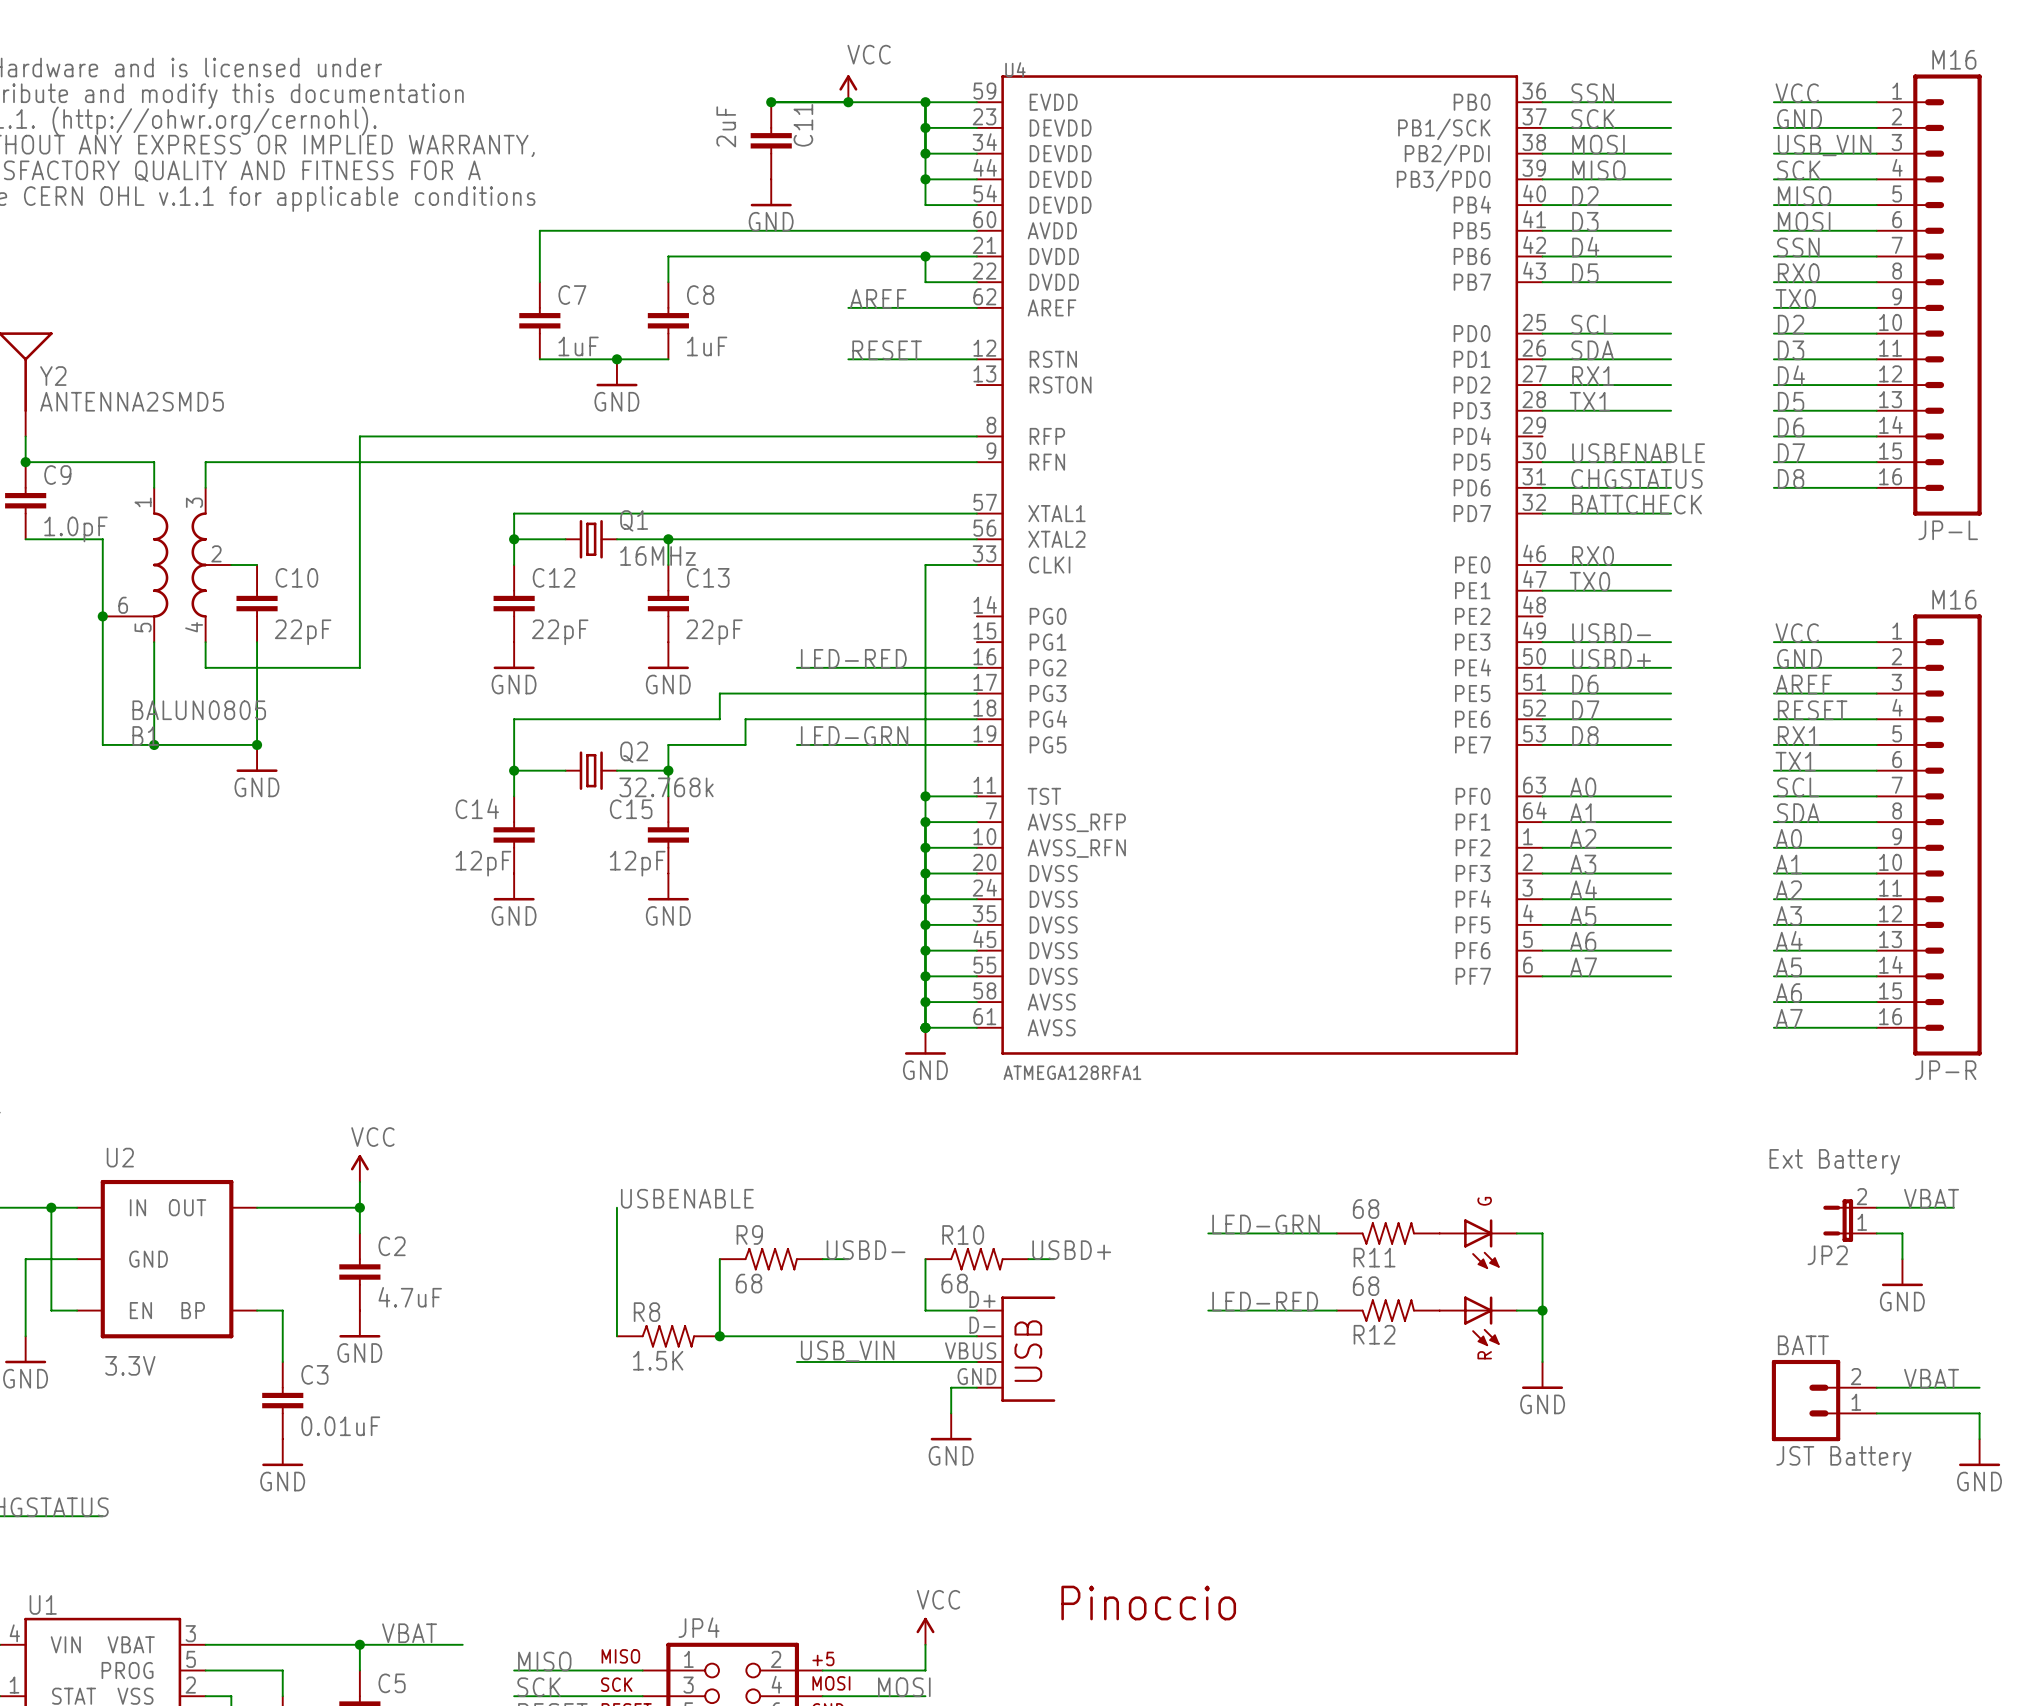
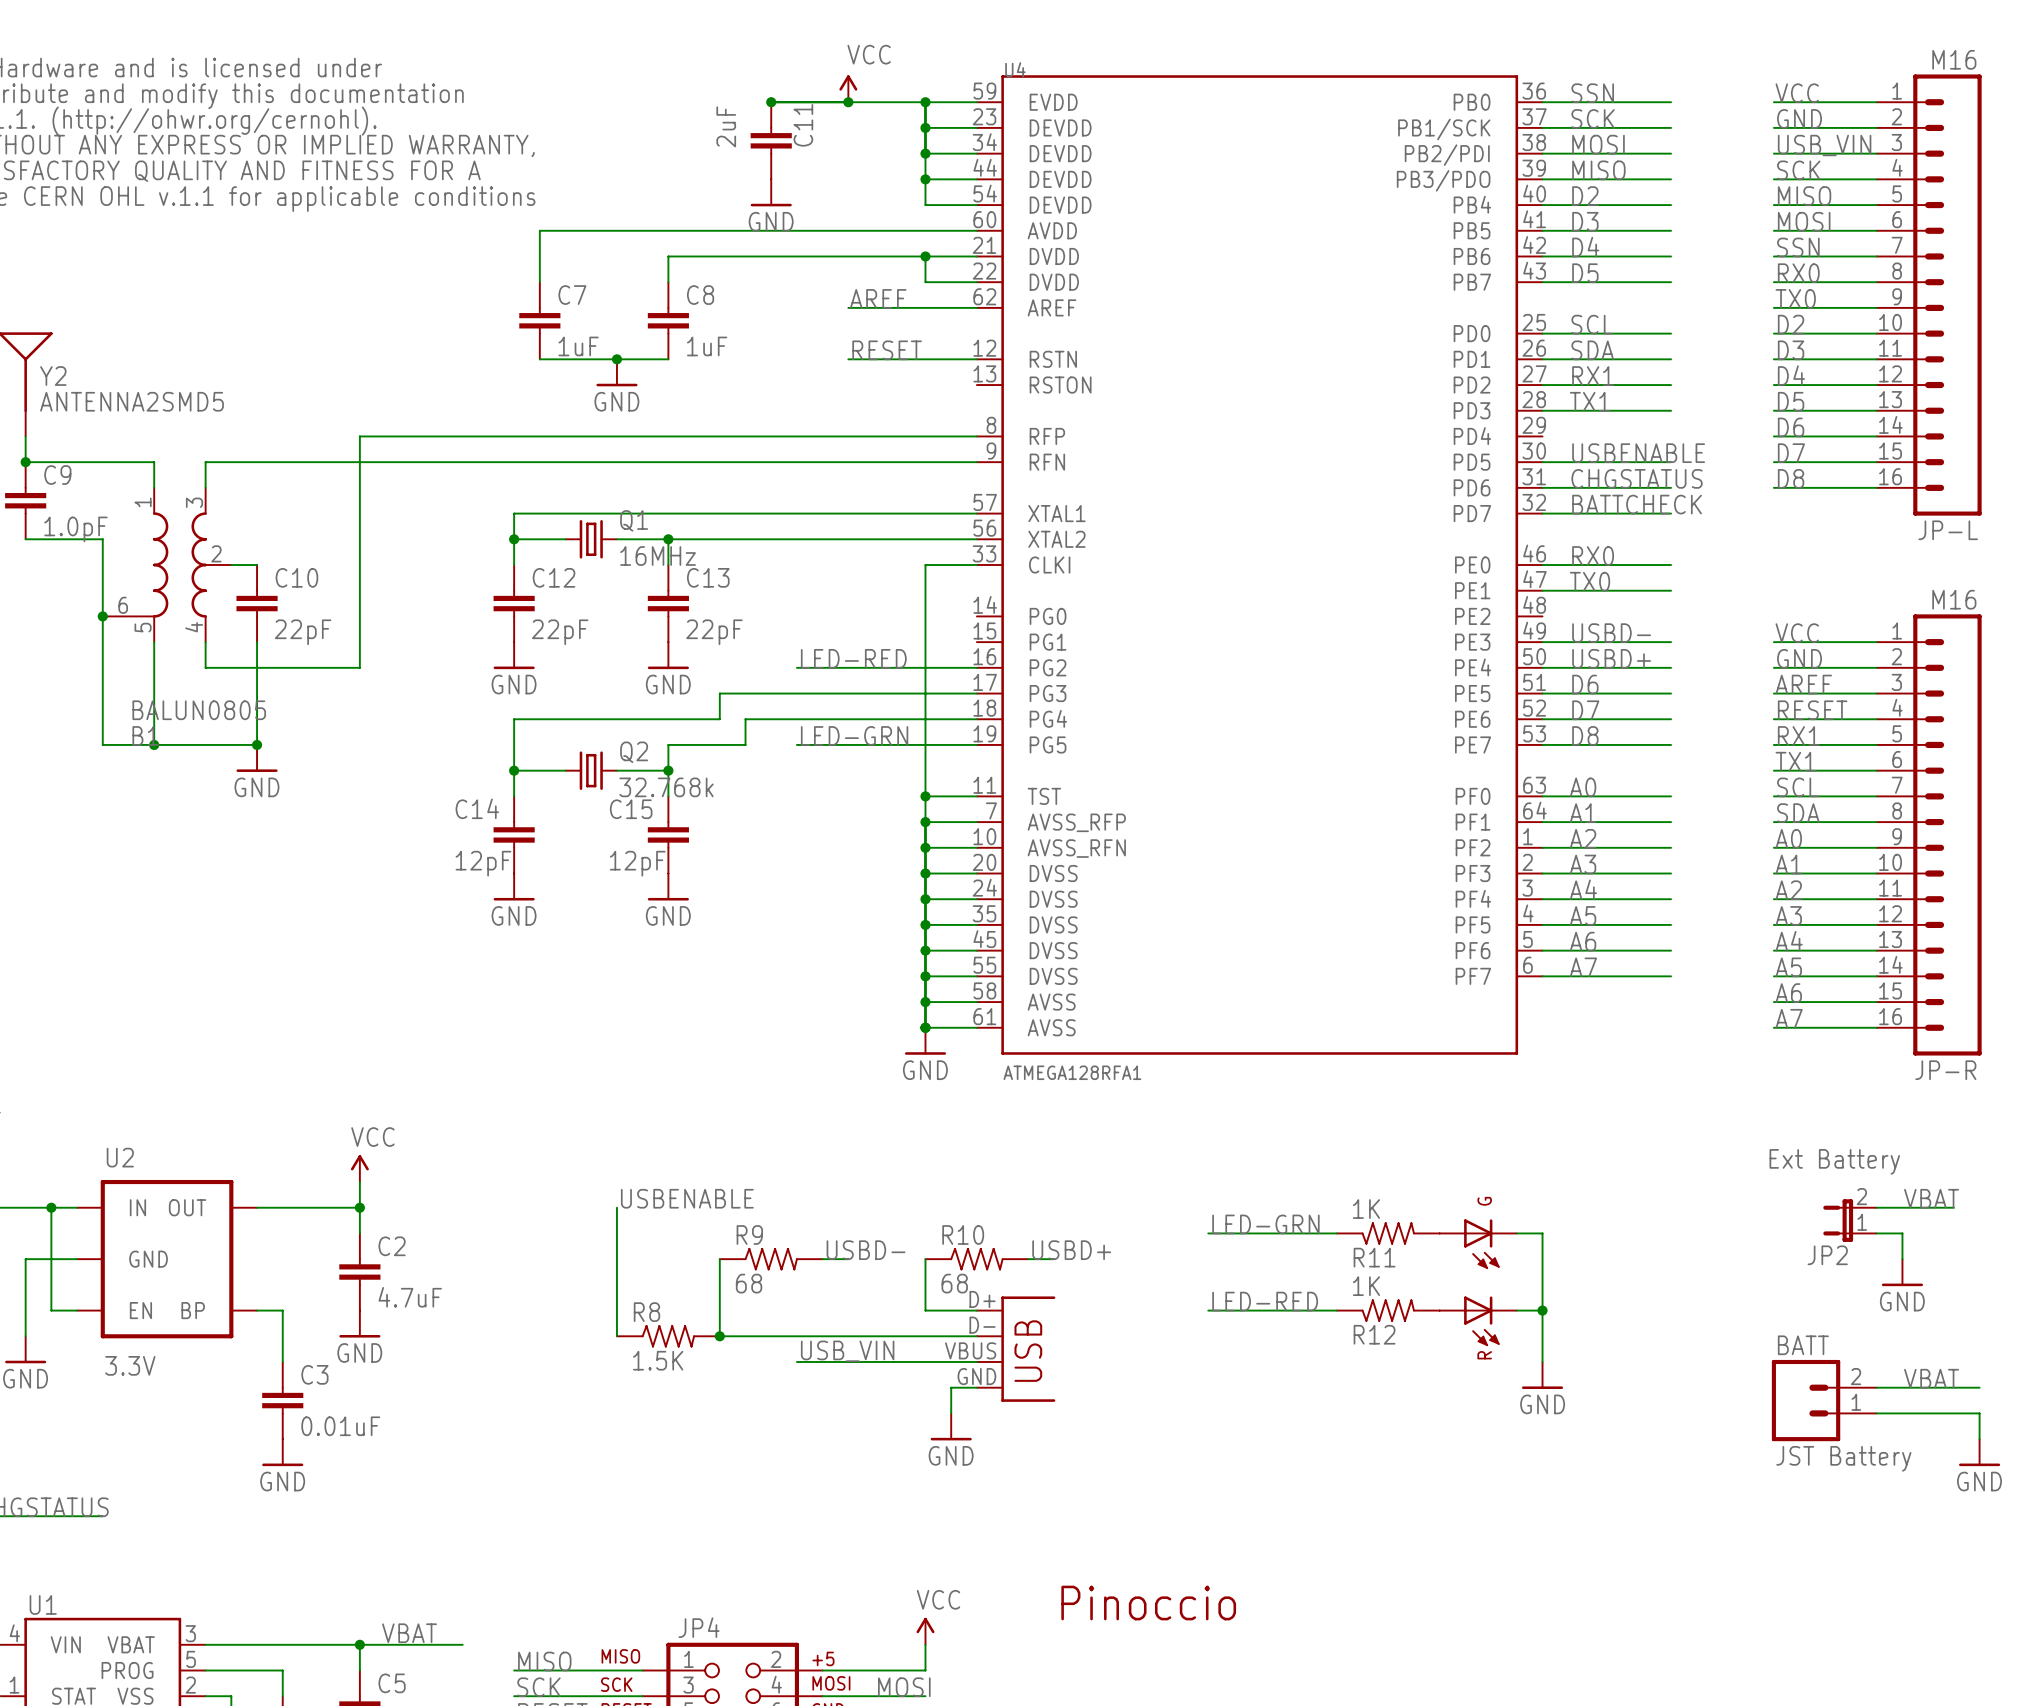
R11 value: 68 (1366, 1209) -> 1K (1366, 1209)
R12 value: 68 (1366, 1286) -> 1K (1366, 1286)

